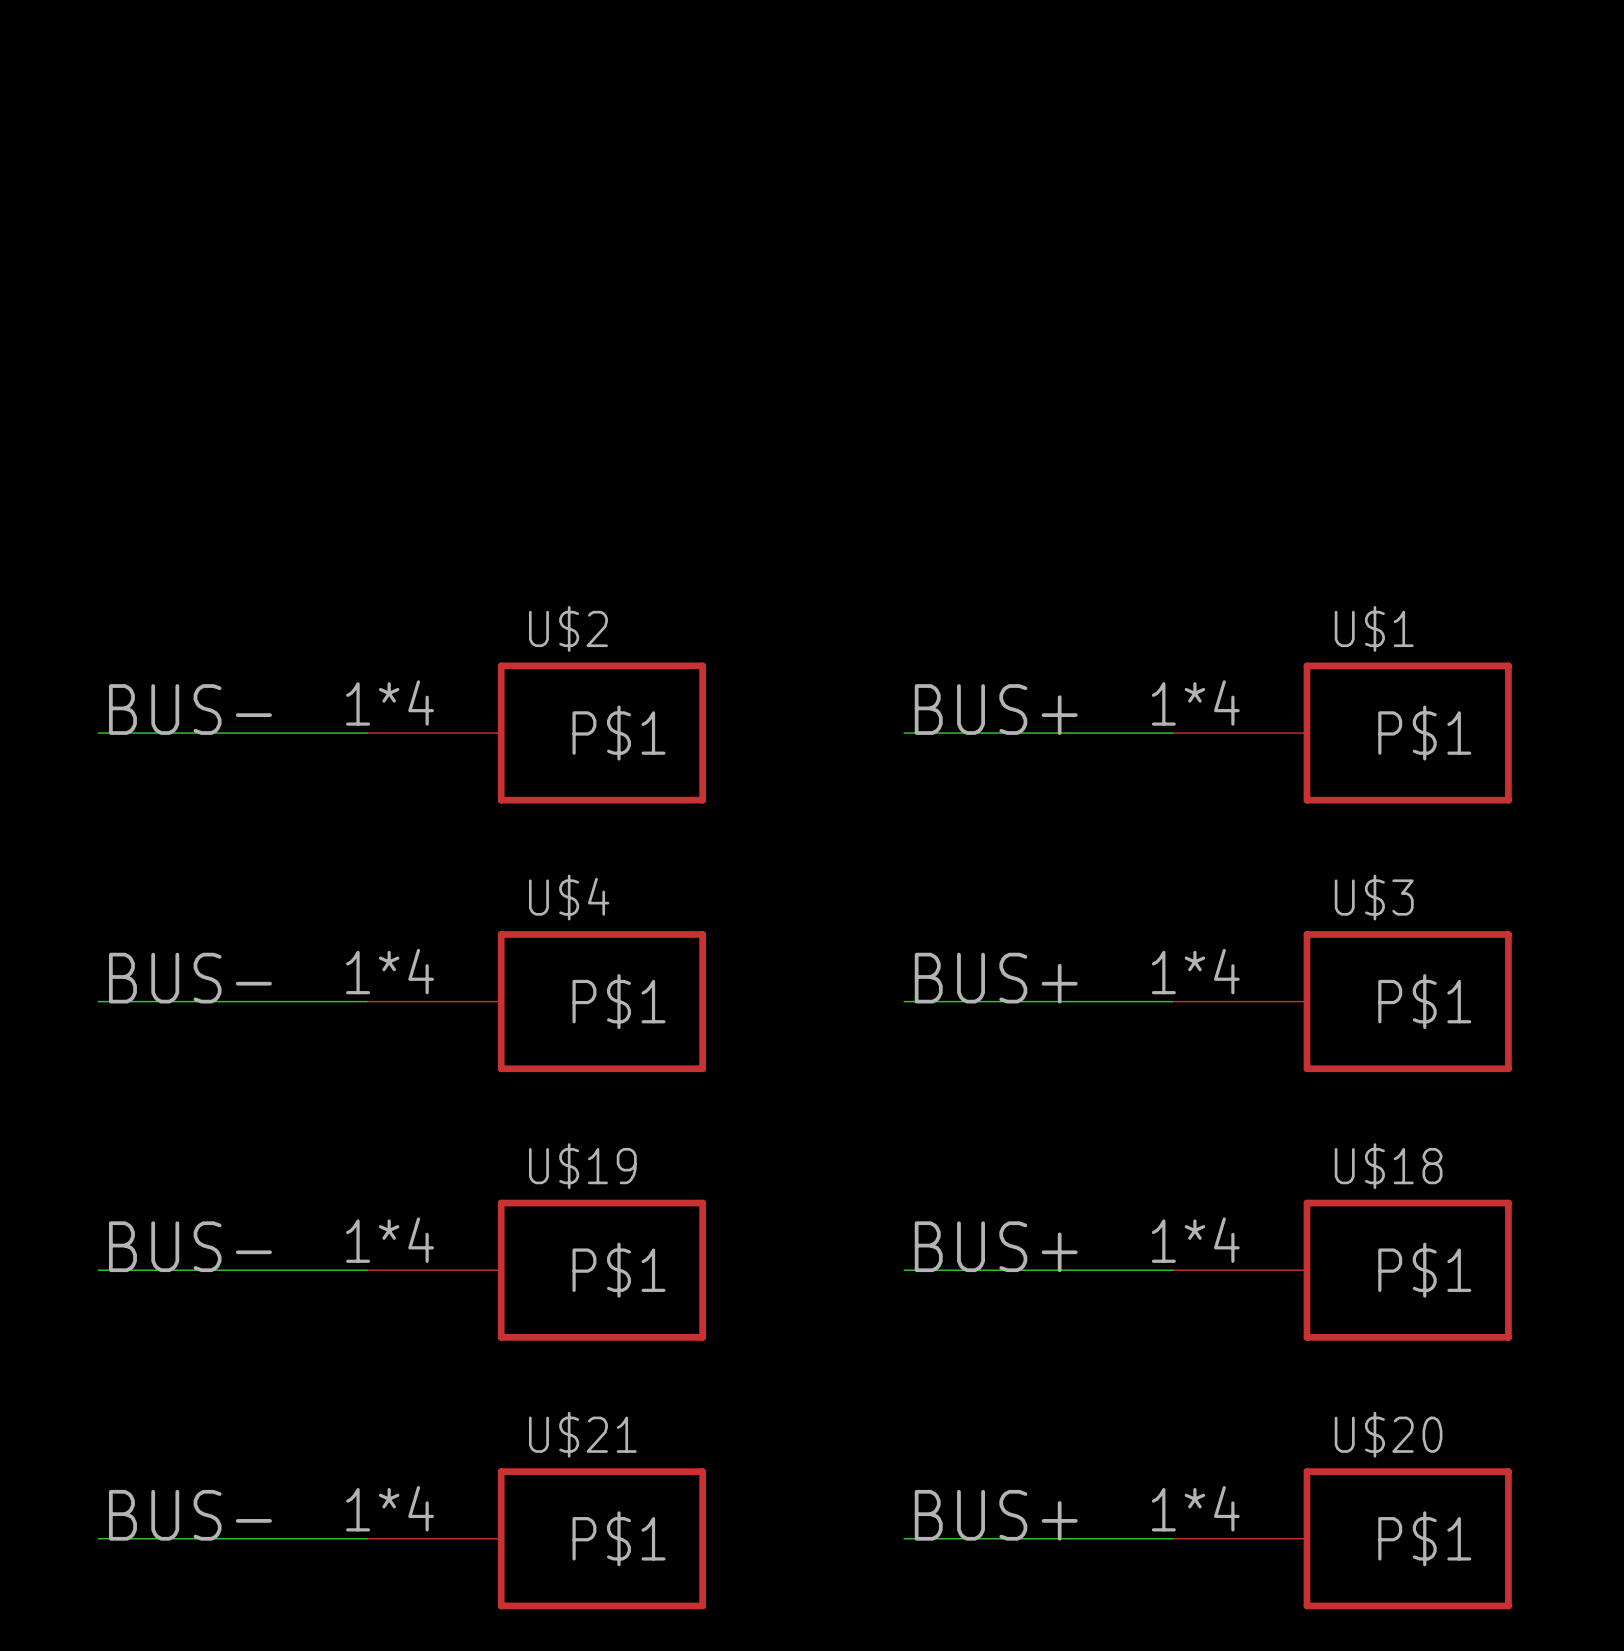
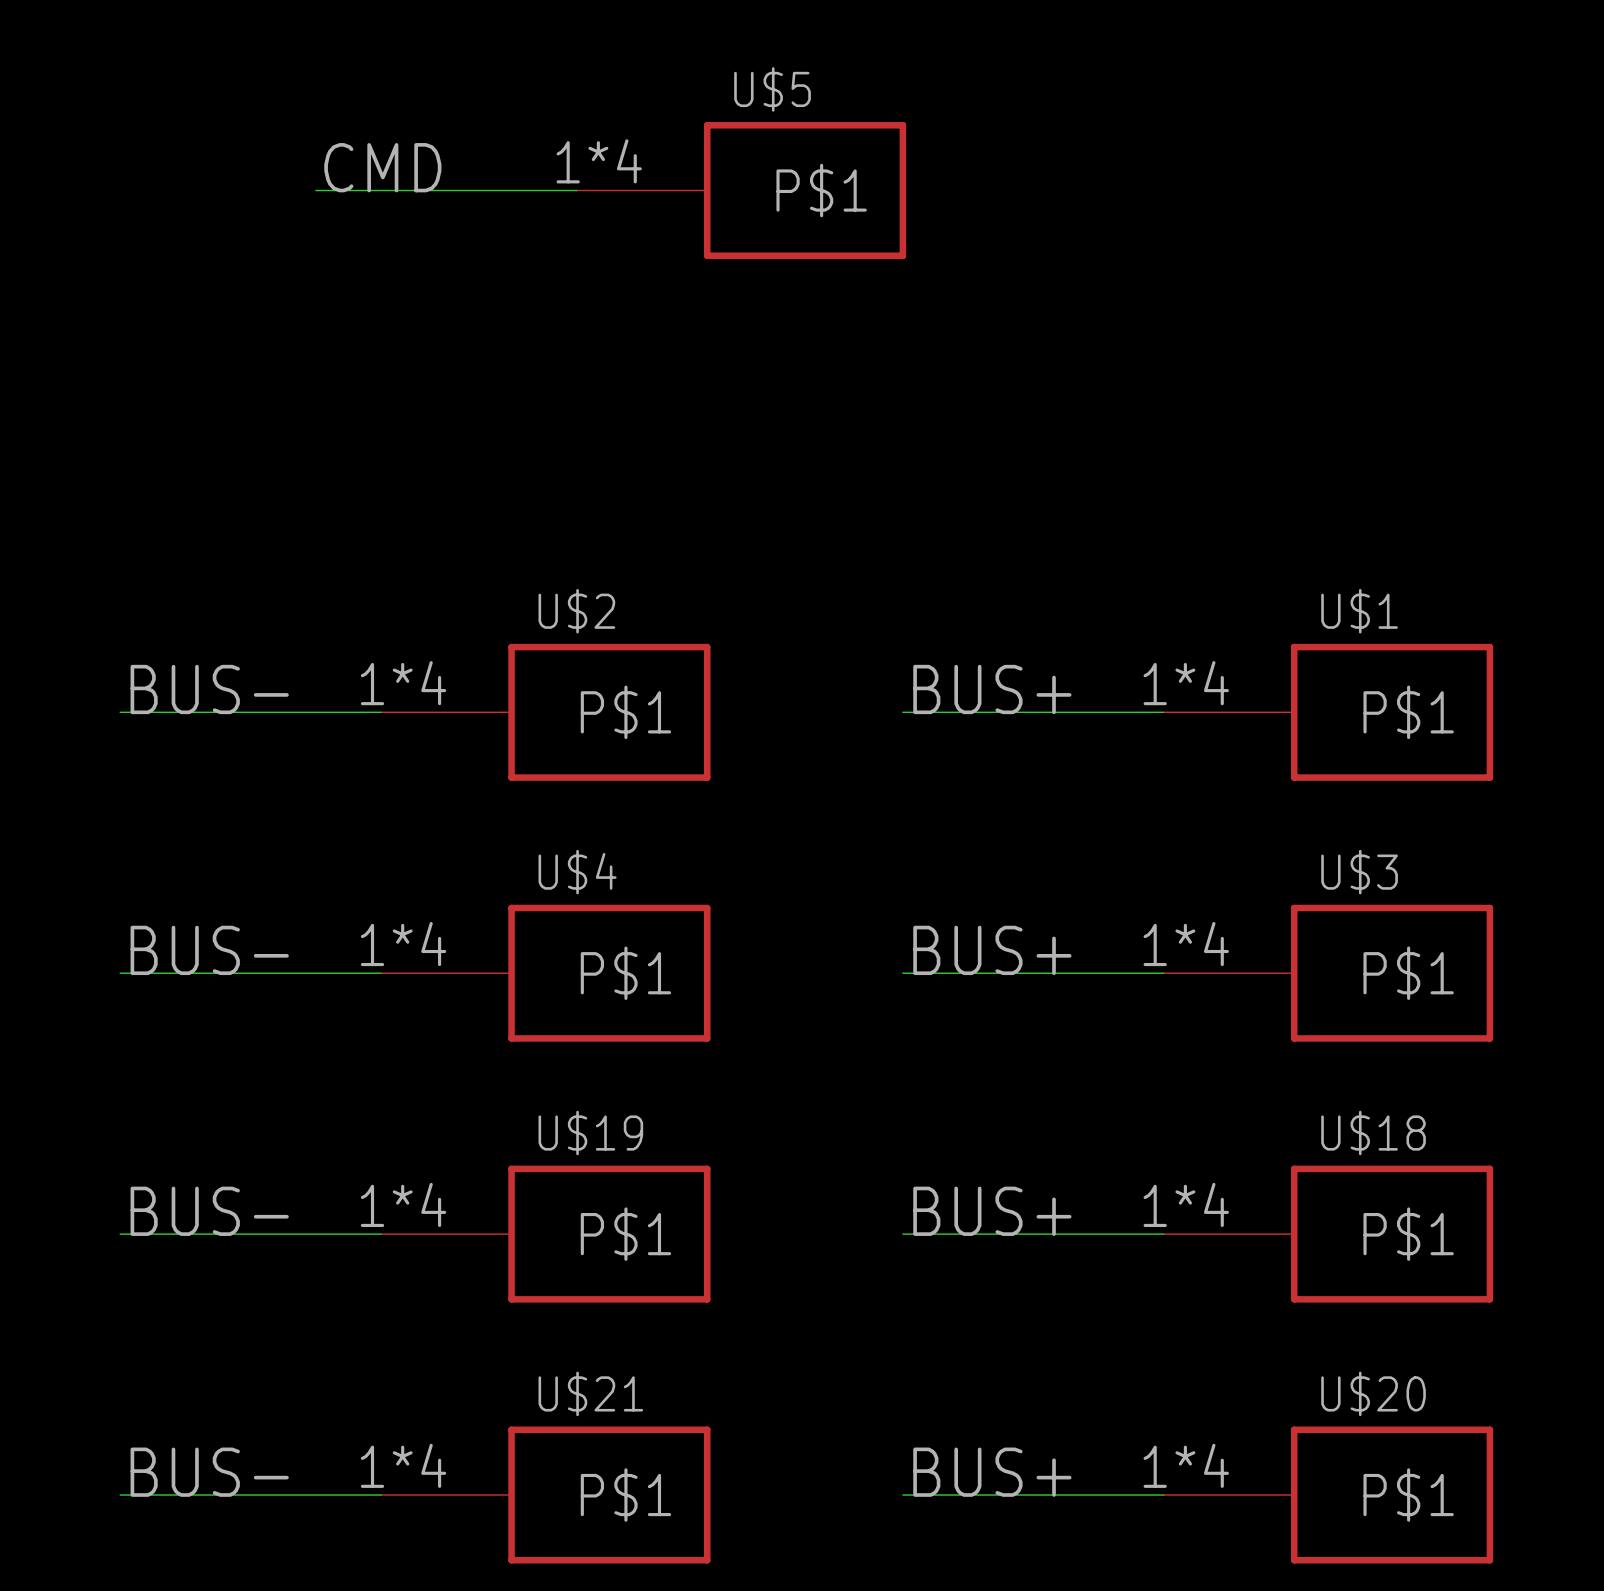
label: none -> CMD (382, 167)
wire: none -> (315, 190) (576, 190)
U$5: none -> (741, 190)

